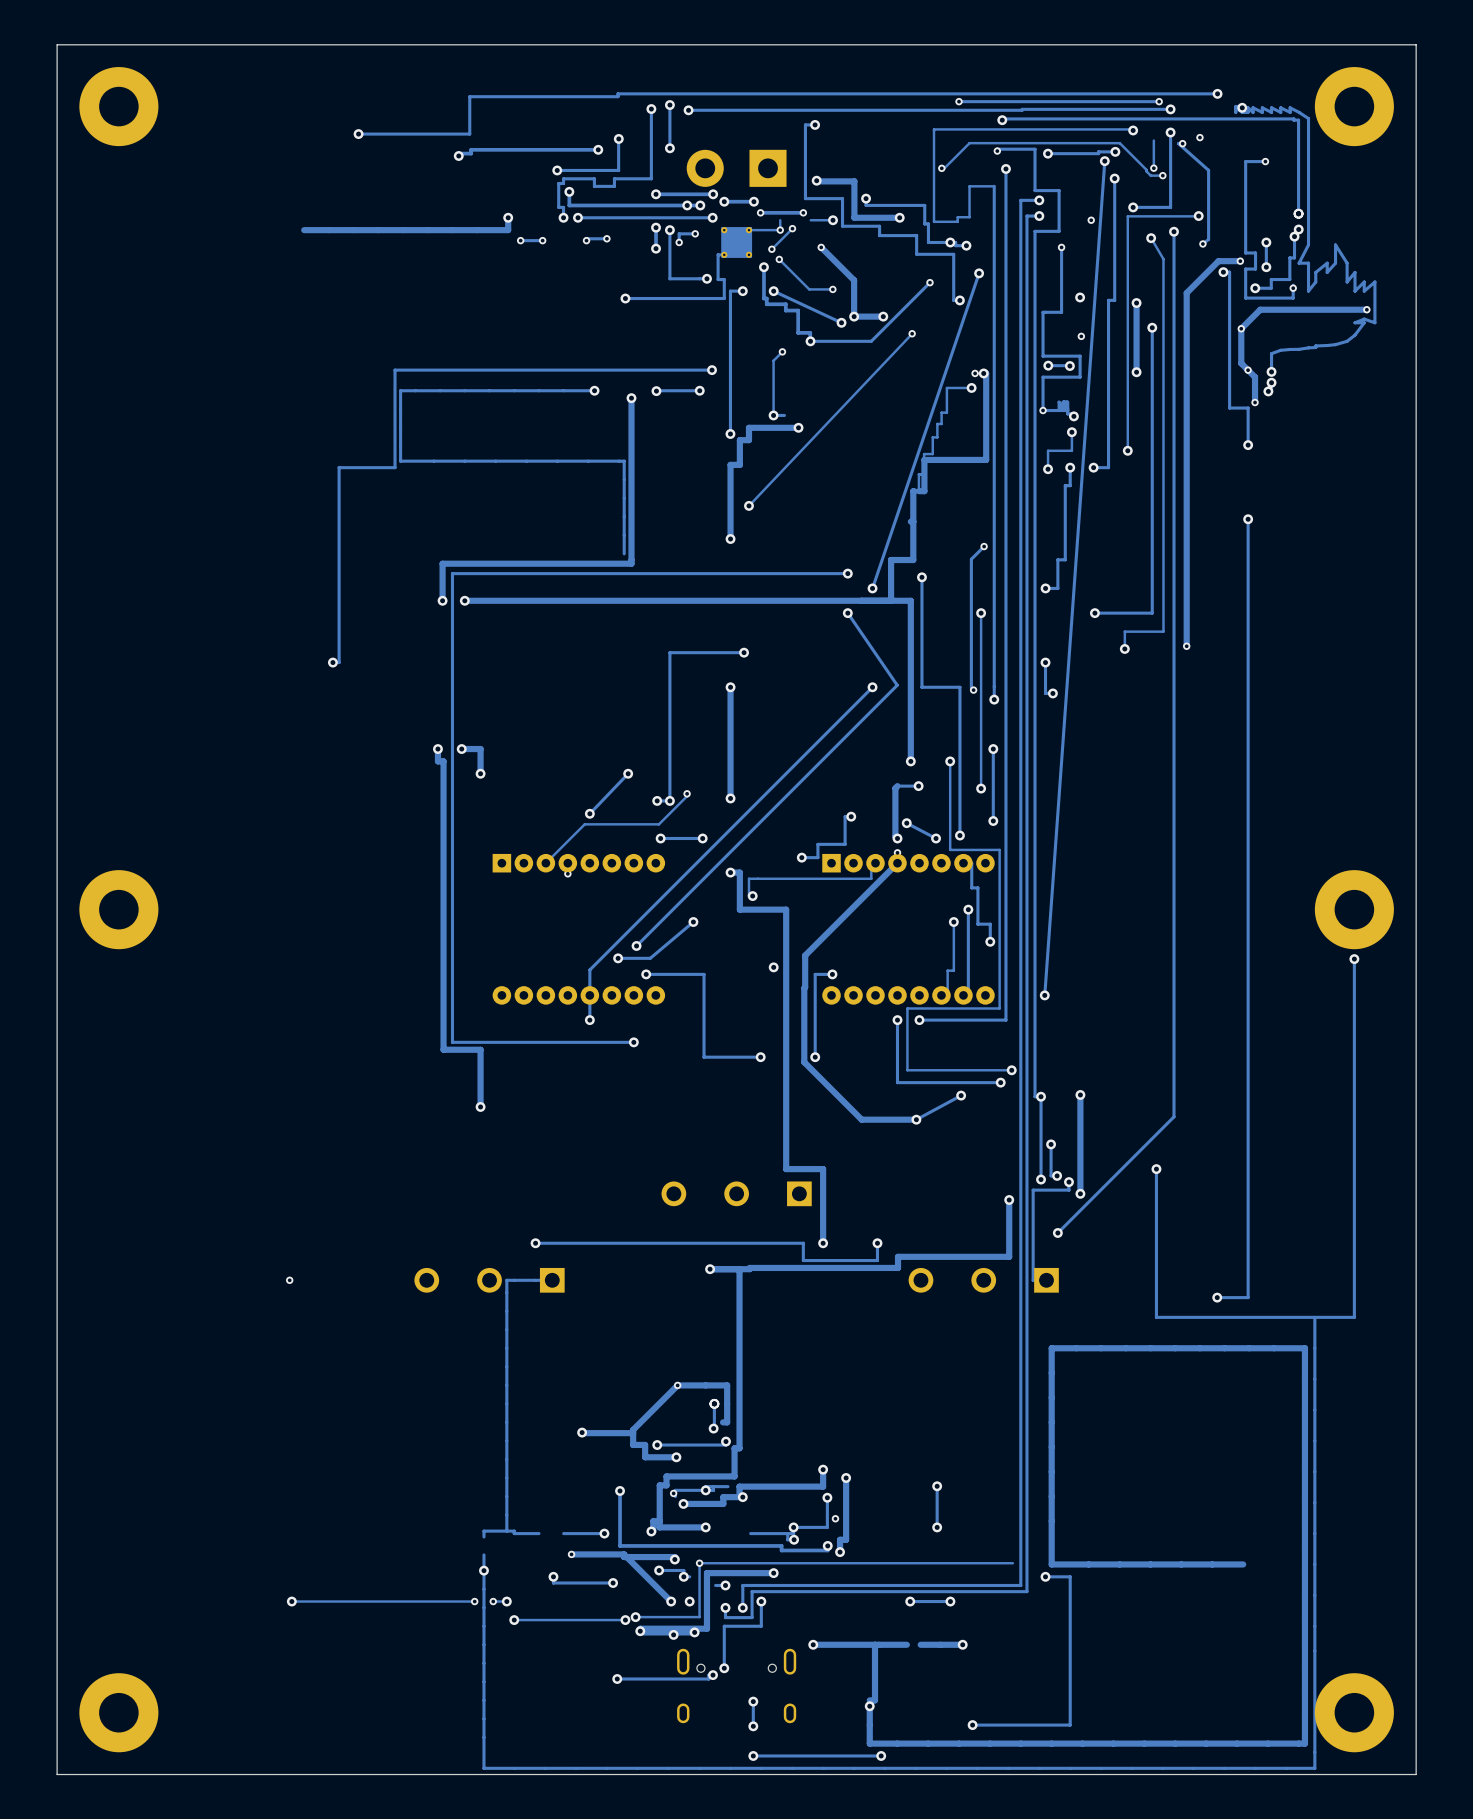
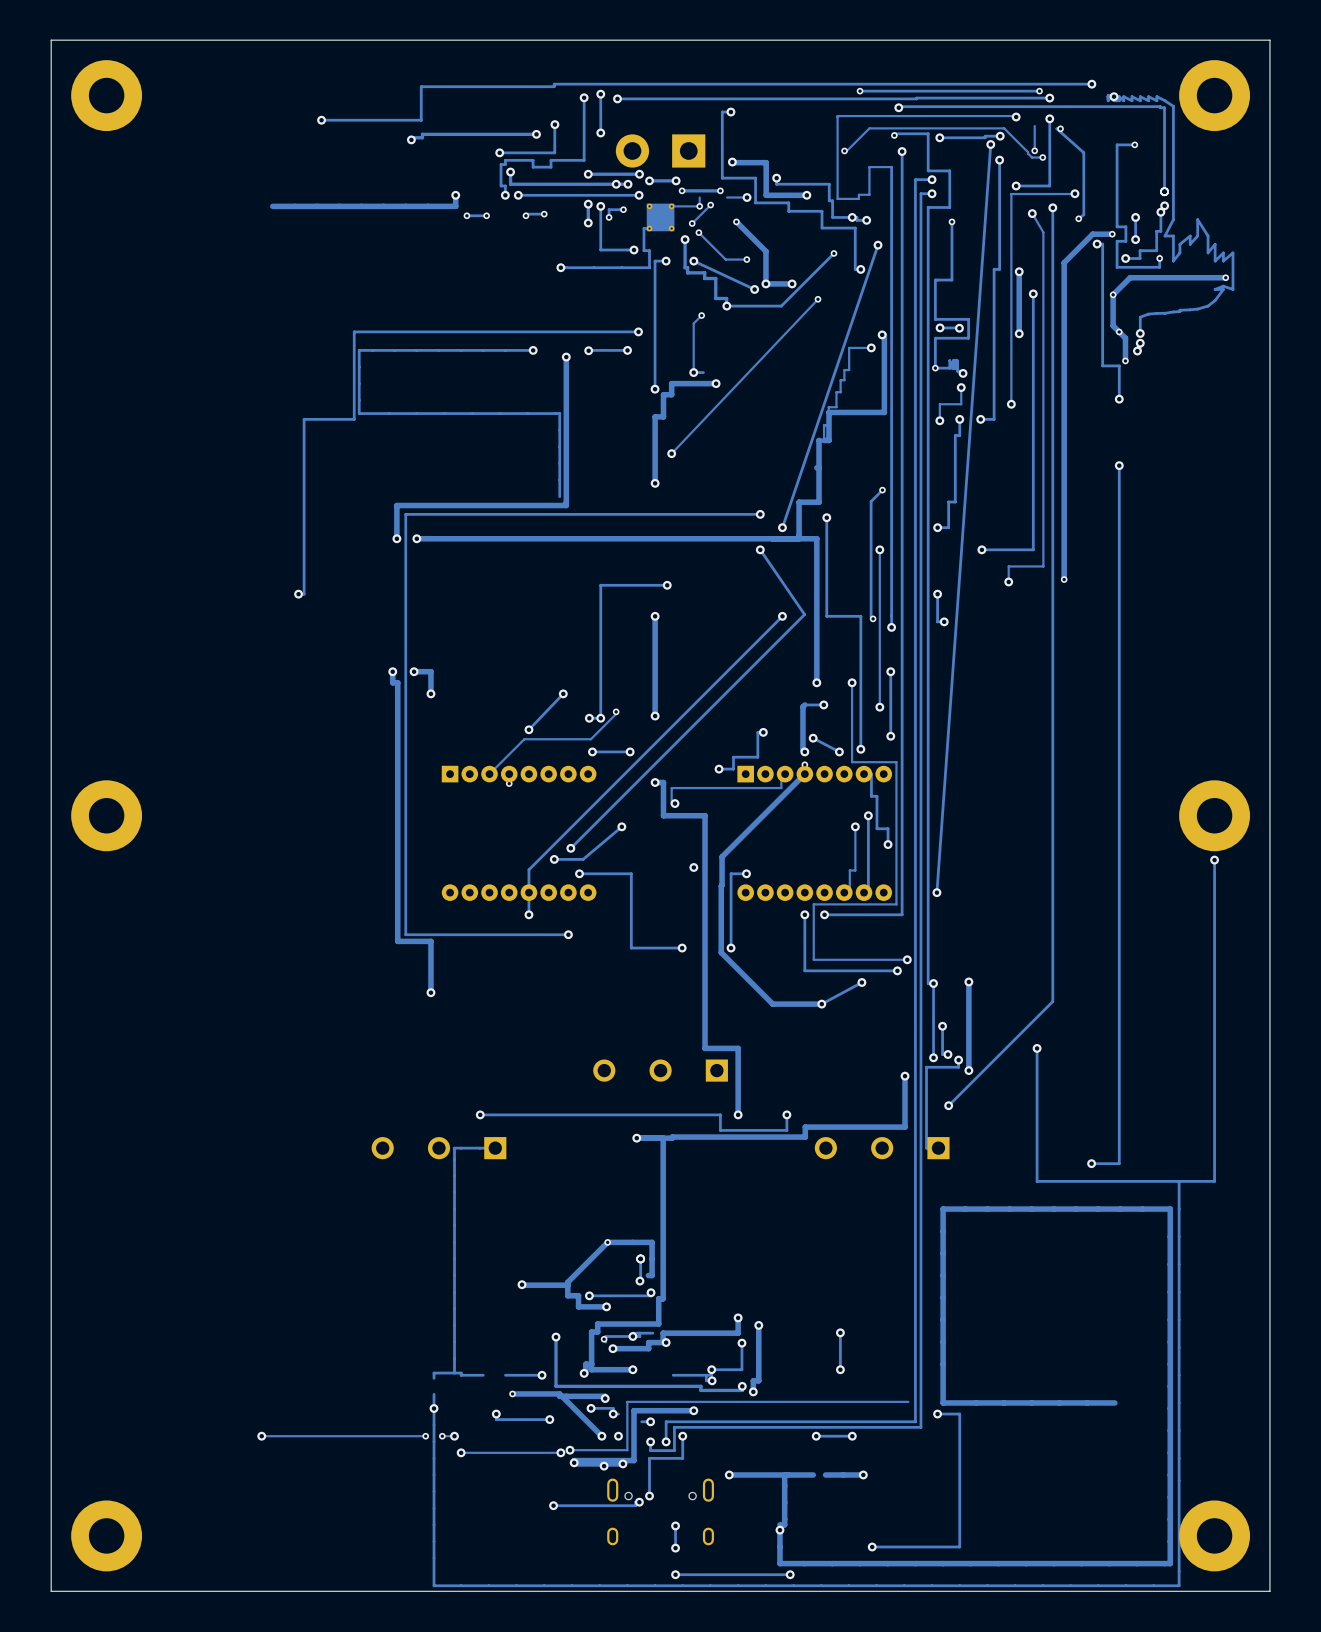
via: (1199, 137) -> none
via: (1091, 220) -> none
via: (1080, 297) -> none
via: (1081, 336) -> none
via: (975, 373) -> none
via: (289, 1280) -> none
via: (835, 1518) -> none
via: (699, 1563) -> none

